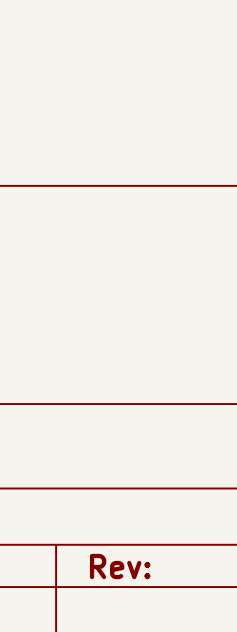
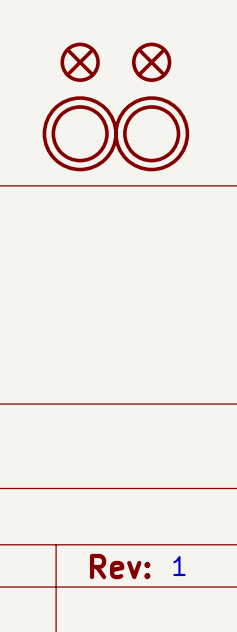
part: none -> (80, 62)
part: none -> (151, 62)
part: none -> (80, 133)
part: none -> (151, 133)
text: none -> 1 (179, 566)

